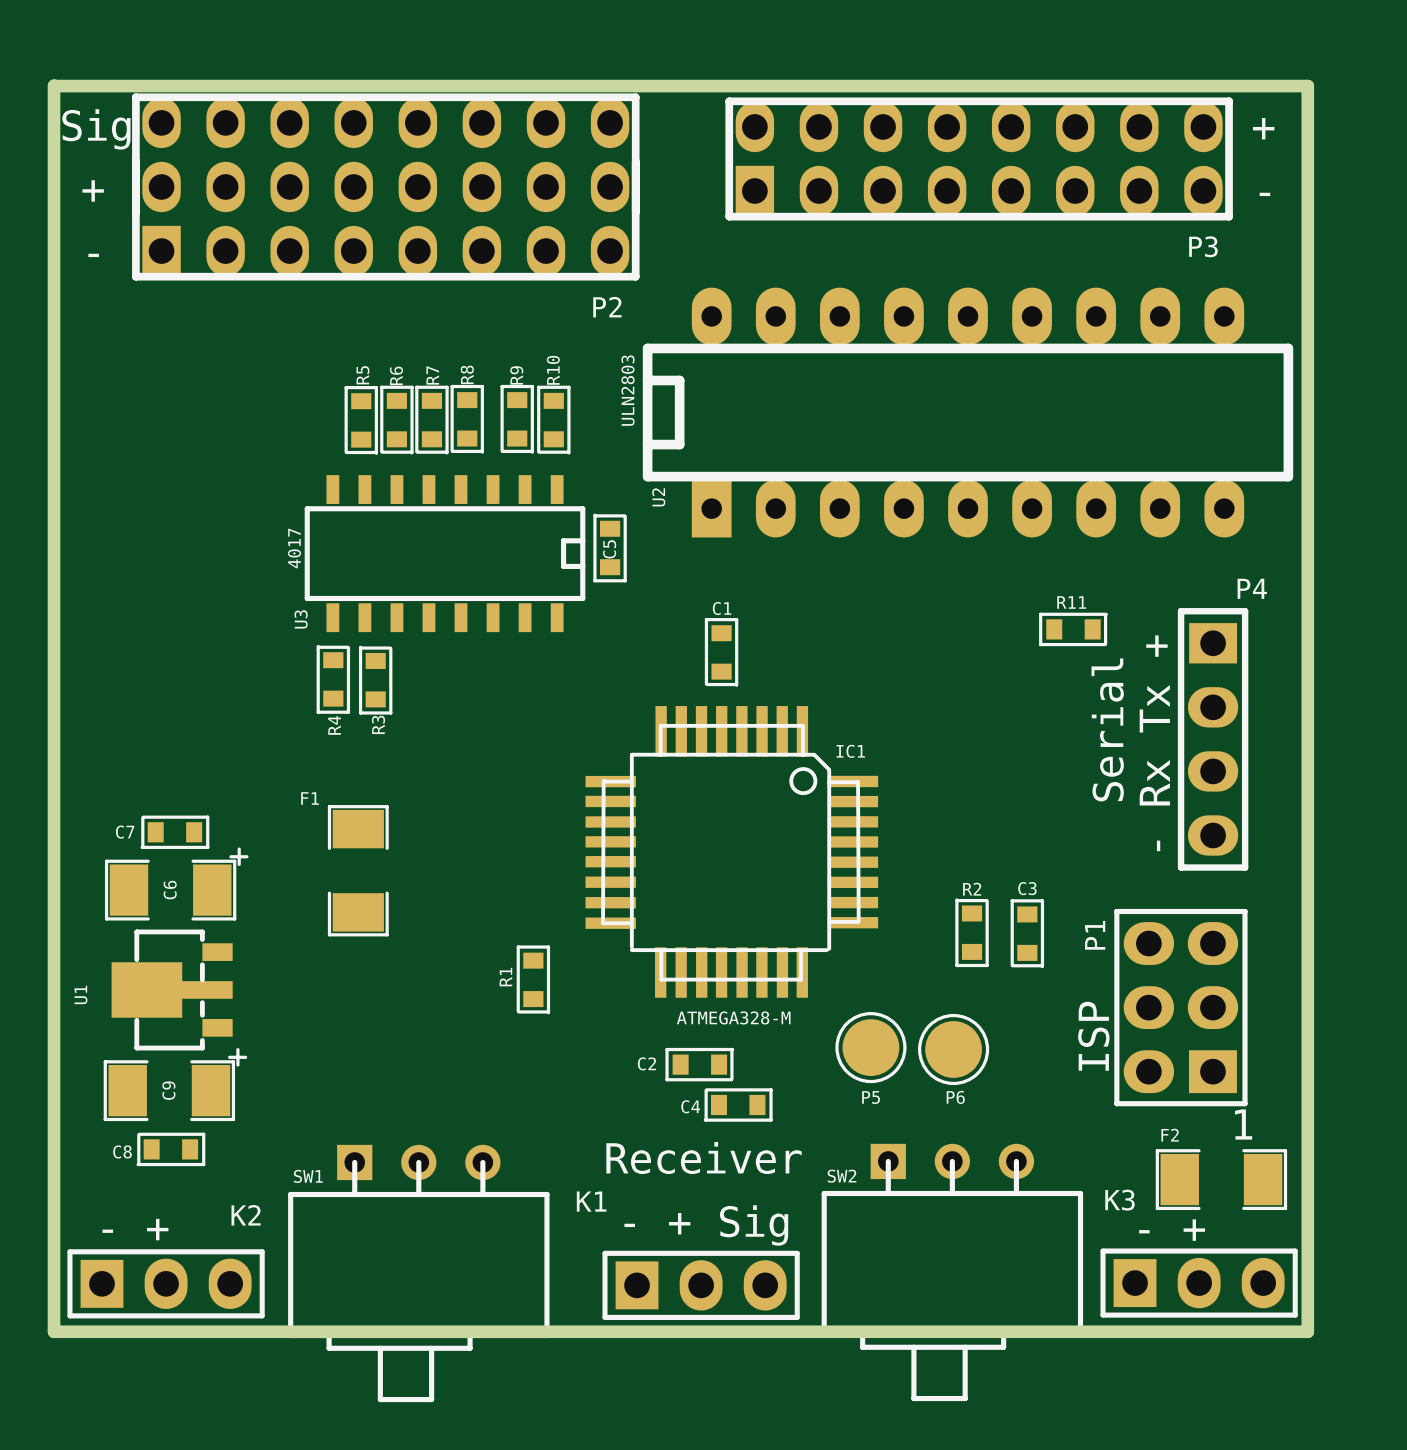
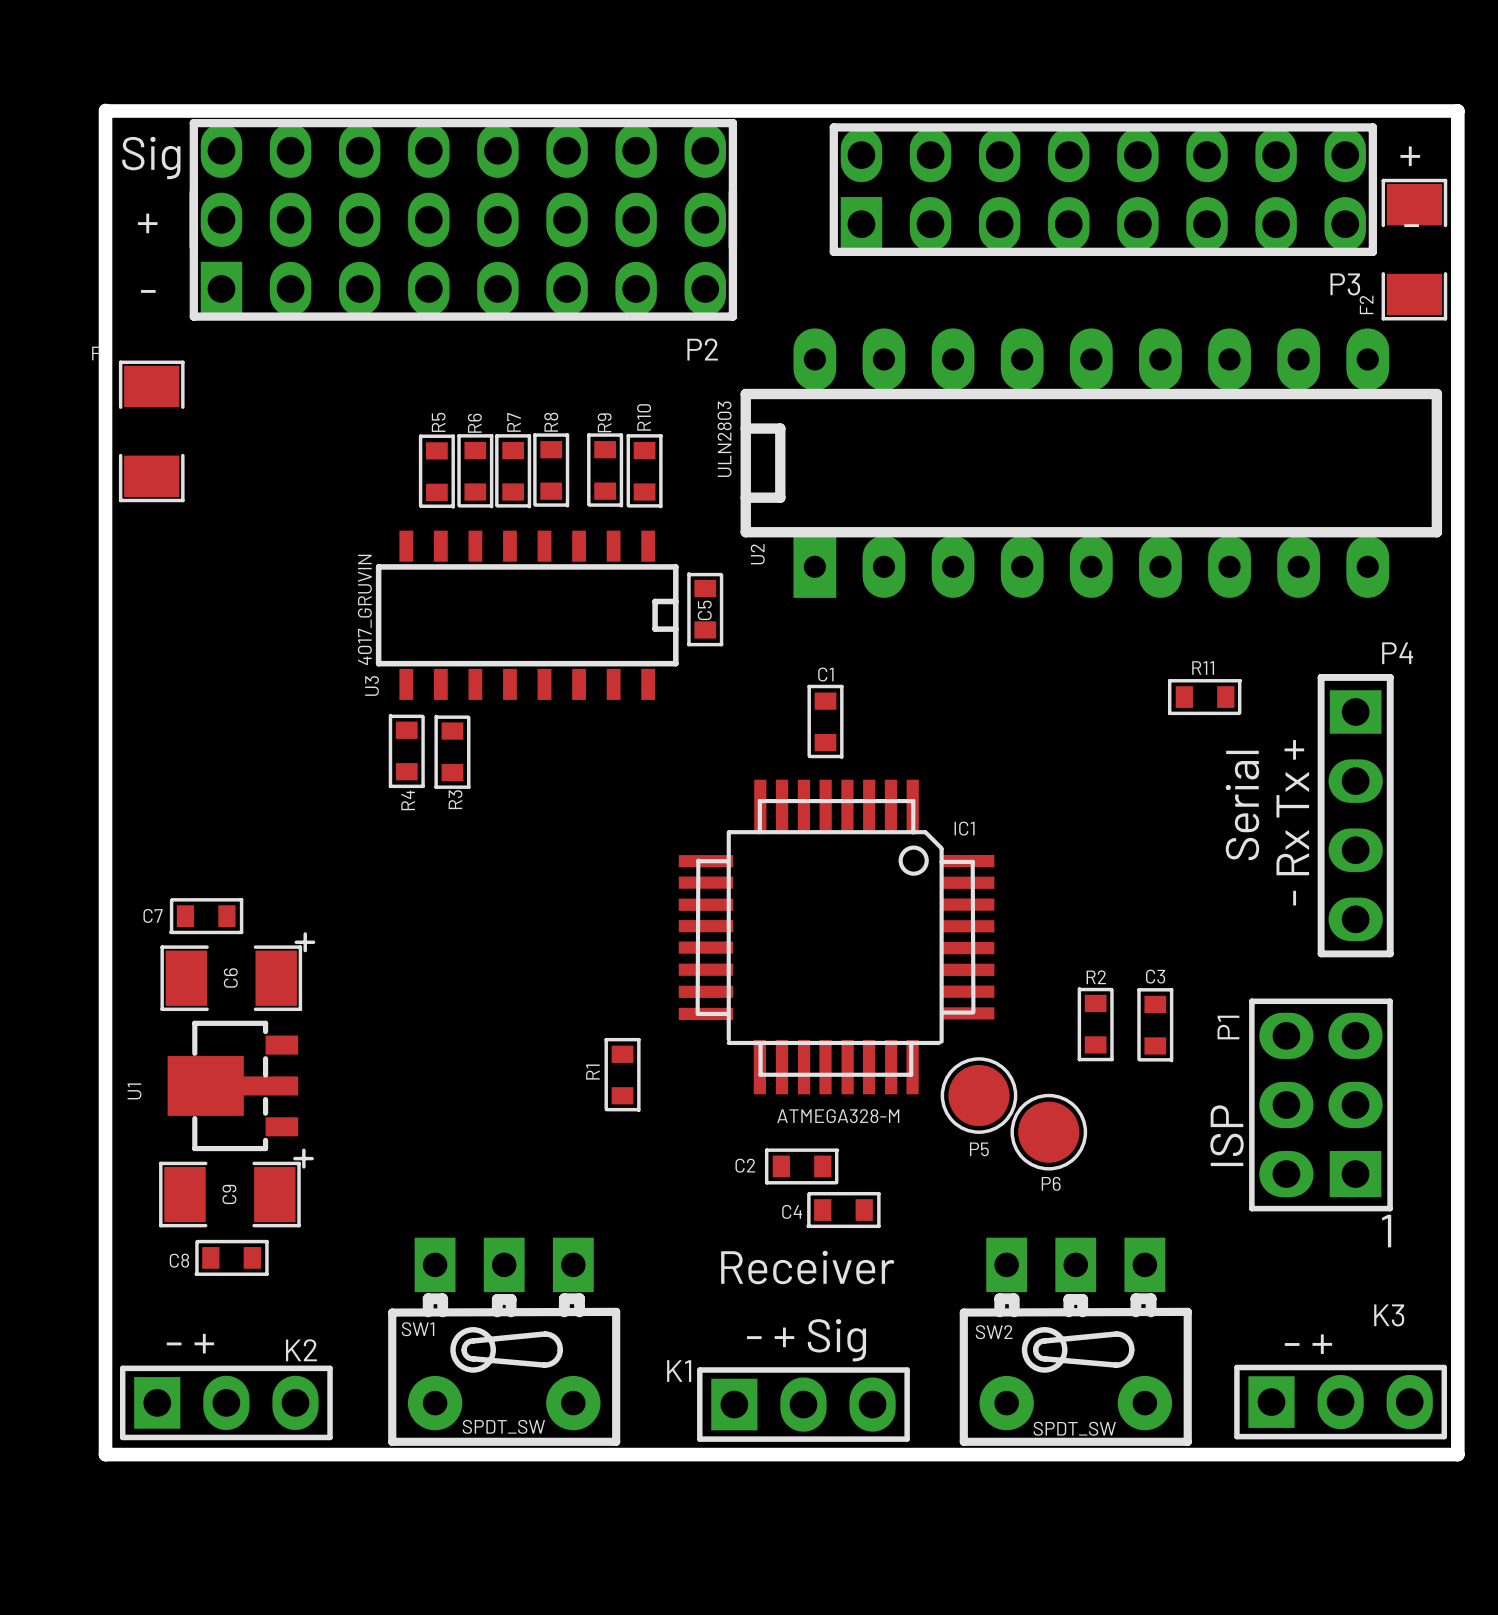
U3 value: 4017 (294, 548) -> 4017_GRUVIN (364, 609)
C7 position: (174, 832) -> (206, 916)
F1 position: (358, 870) -> (151, 431)
P5 position: (870, 1047) -> (979, 1095)
P6 position: (953, 1049) -> (1048, 1132)
F2 name position: F2 (1170, 1135) -> F2 (1366, 304)
SW2 footprint: [821, 1143, 1084, 1402] -> [959, 1237, 1192, 1446]
SW1 footprint: [288, 1144, 550, 1403] -> [388, 1237, 621, 1446]
SW1 name position: SW1 (308, 1176) -> SW1 (418, 1329)
SW2 name position: SW2 (842, 1176) -> SW2 (994, 1332)
F2 rotation: 0° (1221, 1179) -> 90° clockwise (1414, 249)
F2 position: (1221, 1179) -> (1414, 249)
K3 name position: K3 (1120, 1200) -> K3 (1389, 1315)
K1 name position: K1 (591, 1201) -> K1 (679, 1371)
K2 name position: K2 (246, 1215) -> K2 (301, 1350)
SW1 value: none -> SPDT_SW (503, 1426)
SW2 value: none -> SPDT_SW (1074, 1428)

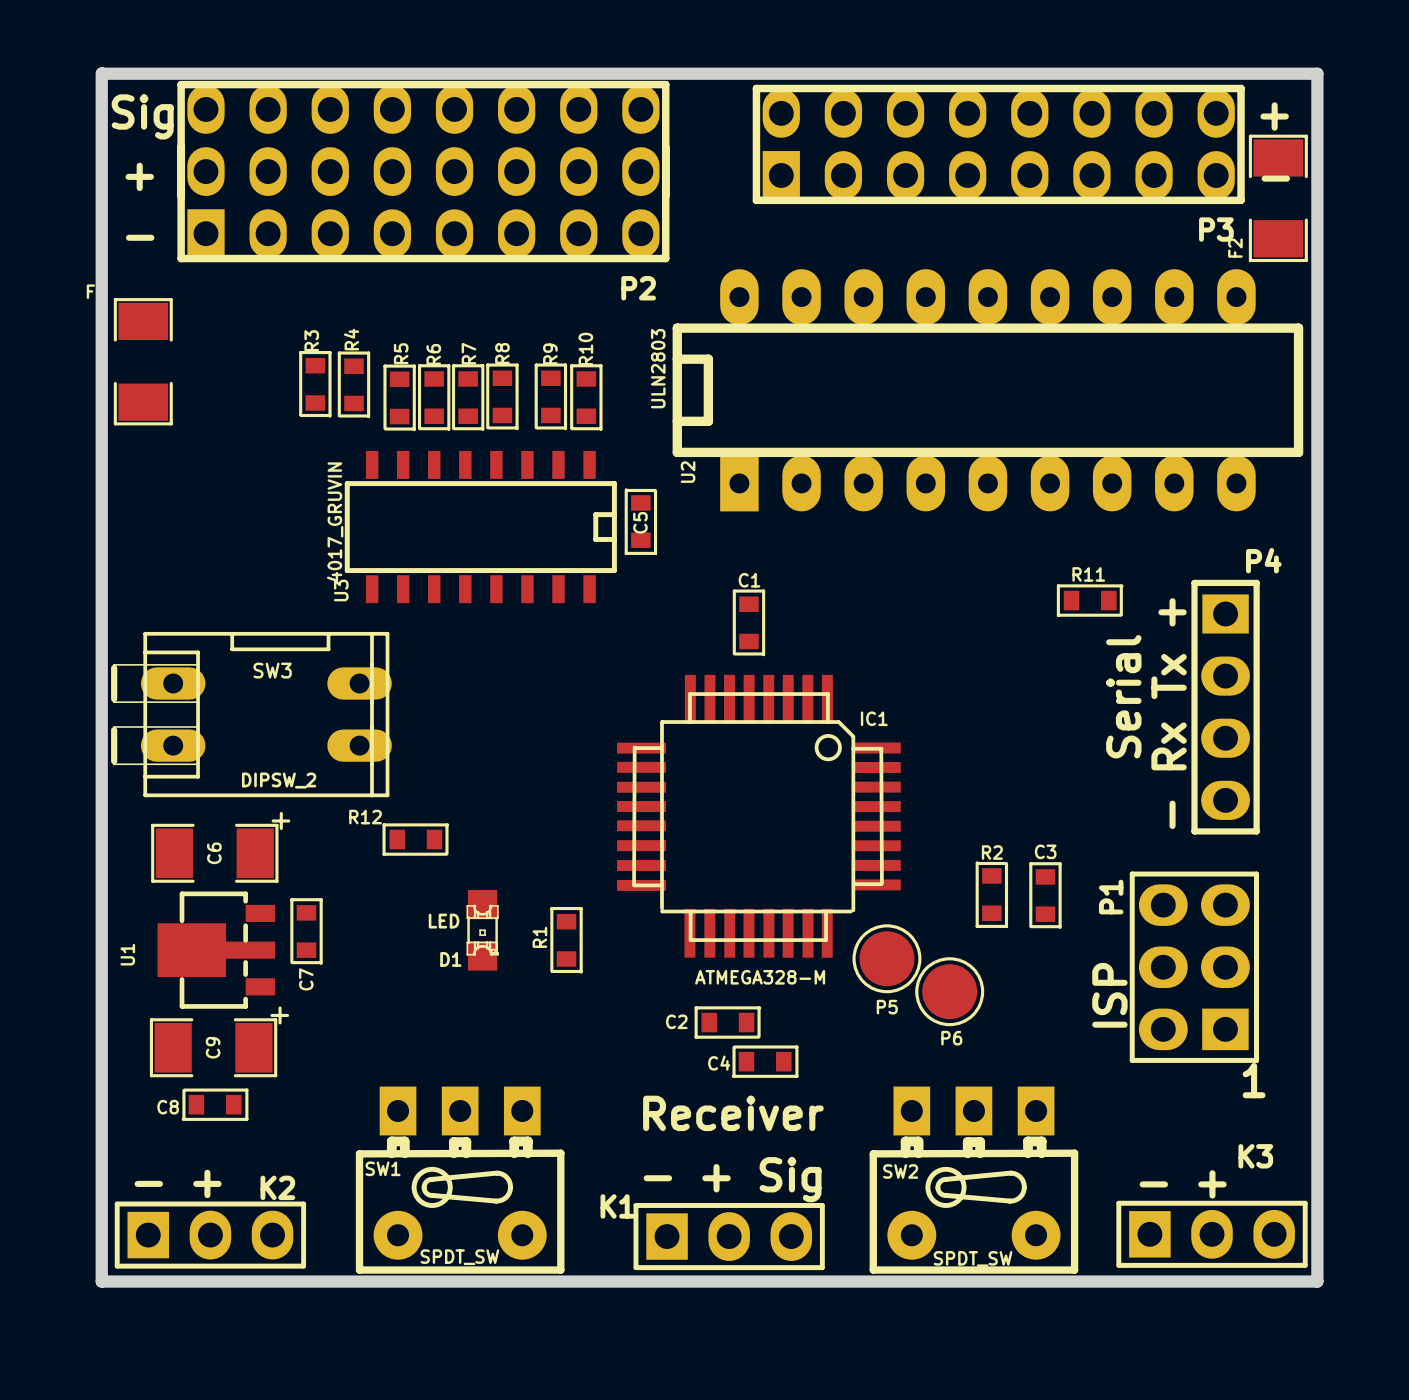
R4 rotation: 0° (406, 750) -> 180° (353, 384)
R4 position: (406, 750) -> (353, 384)
R3 rotation: 0° (452, 751) -> 180° (315, 384)
R3 position: (452, 751) -> (315, 384)
SW3: none -> DIPSW_2 (251, 714)
C7 rotation: 0° (206, 916) -> 90° counterclockwise (306, 931)
C7 position: (206, 916) -> (306, 931)
R12: none -> (415, 839)
D1: none -> LED (482, 930)

